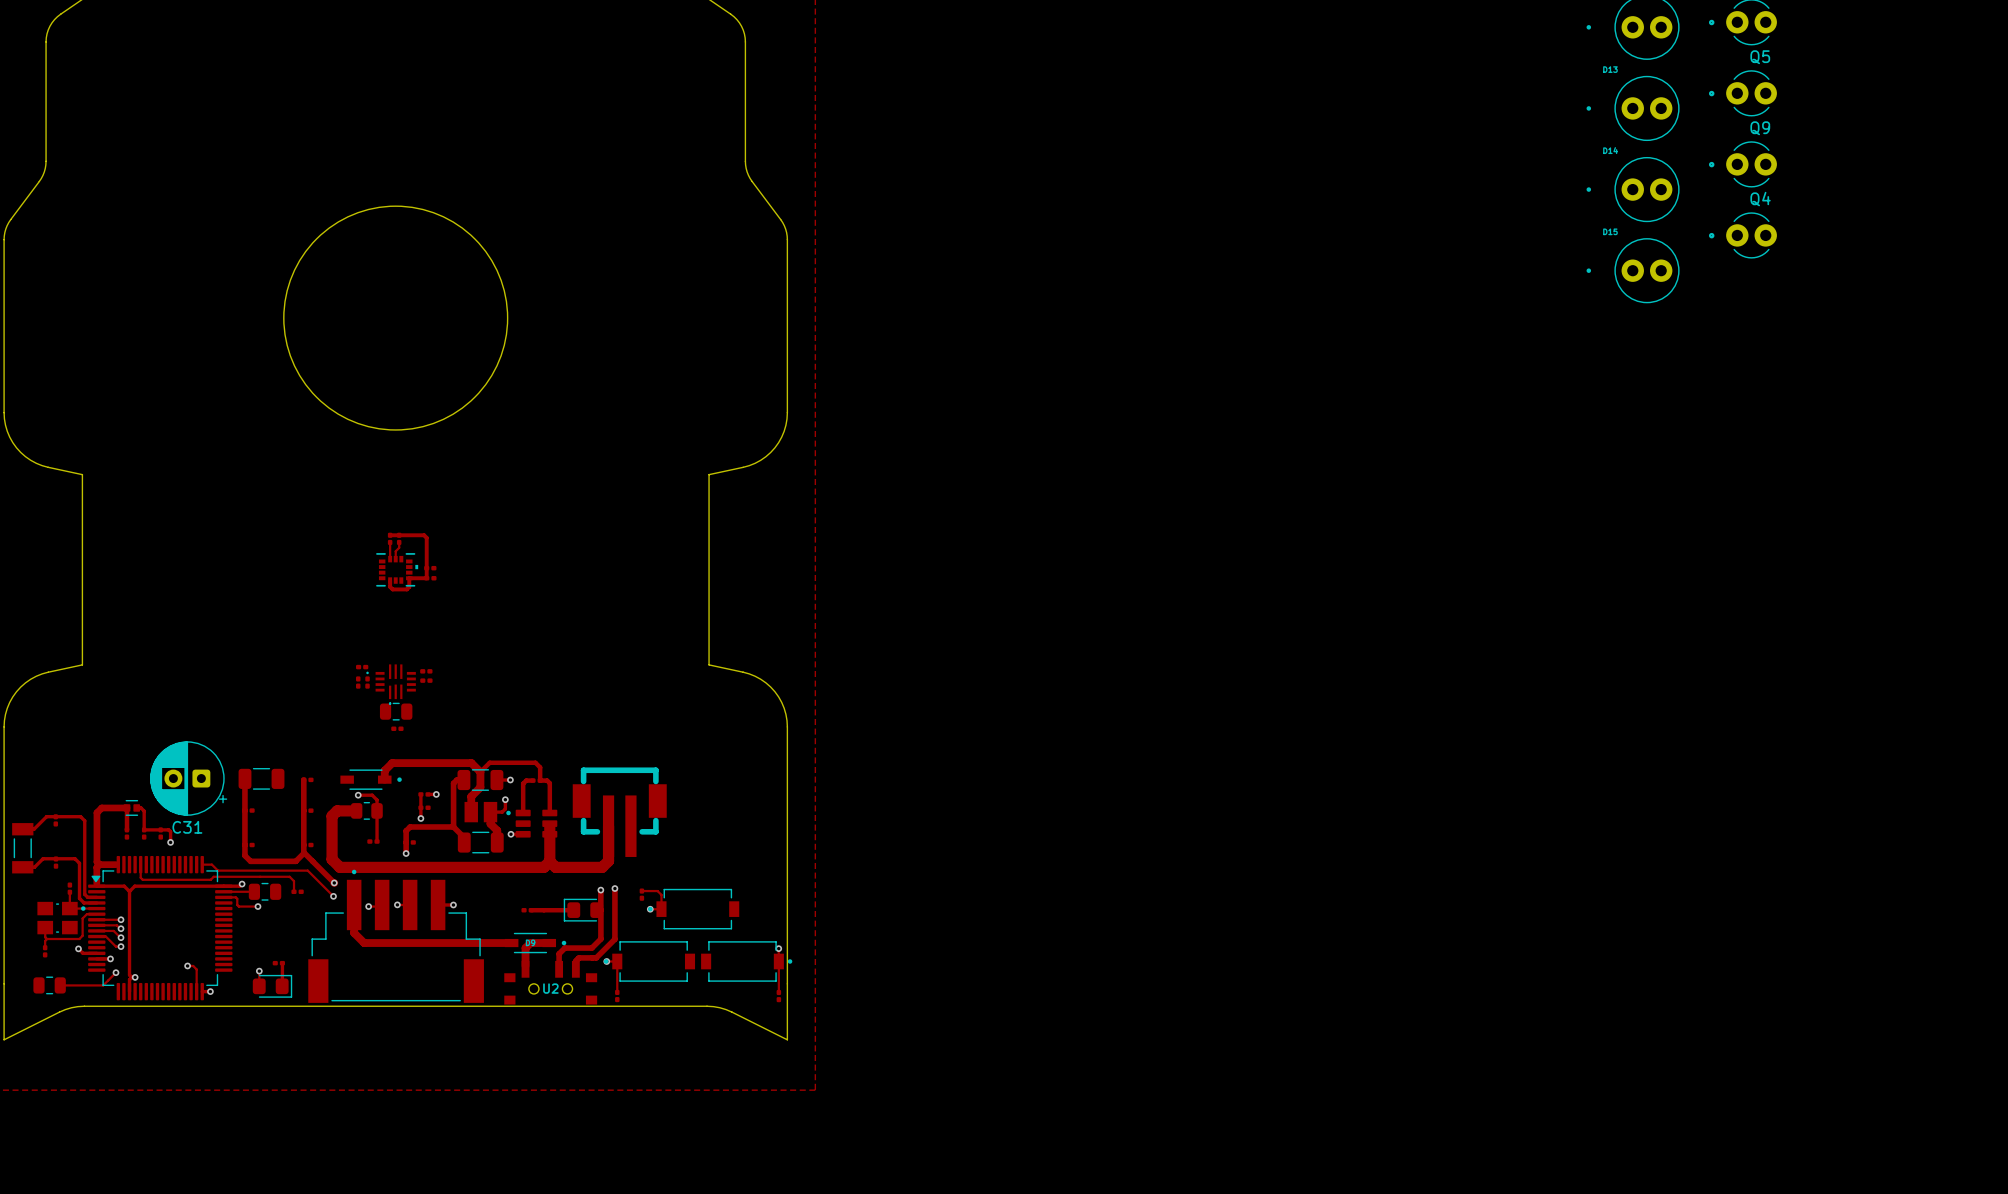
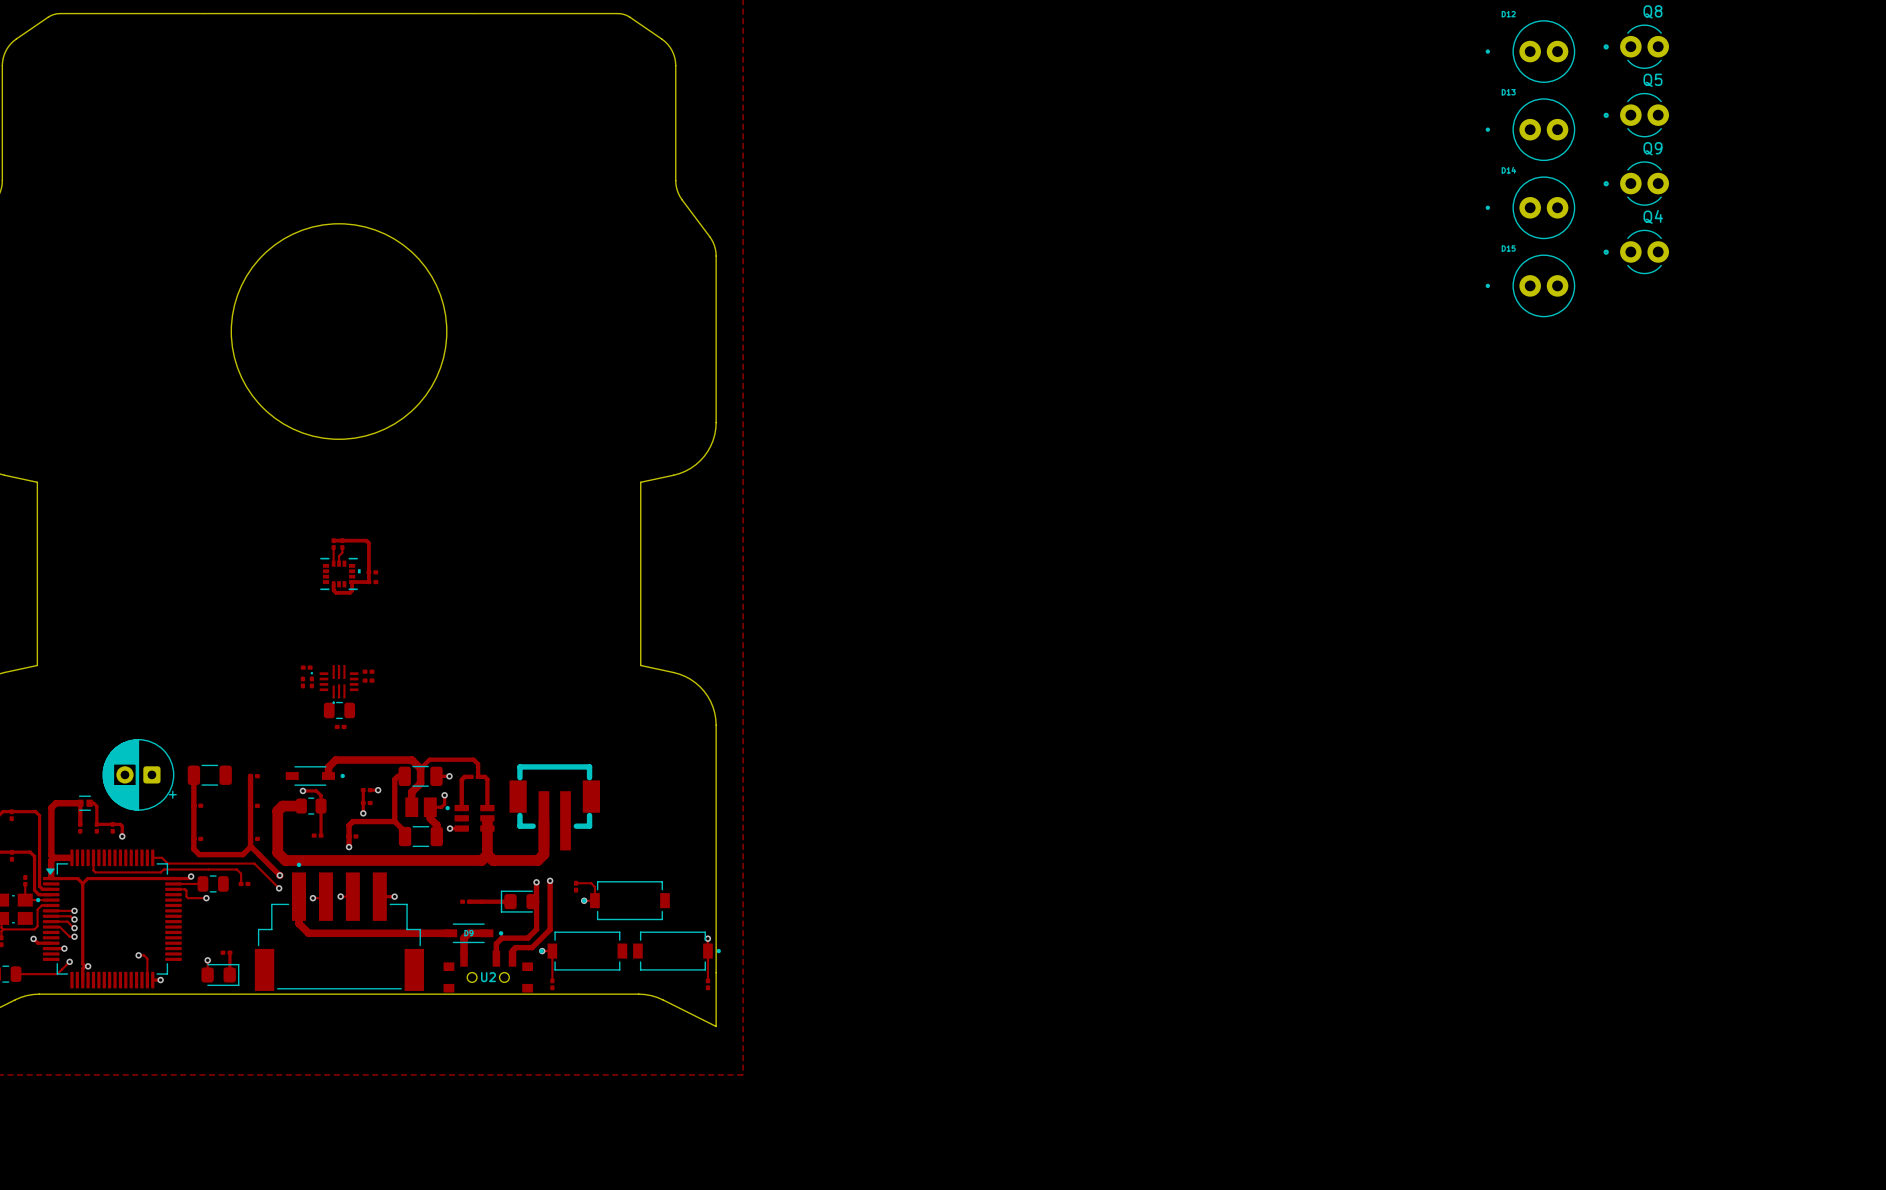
C31 name: C31 (187, 827) -> none

